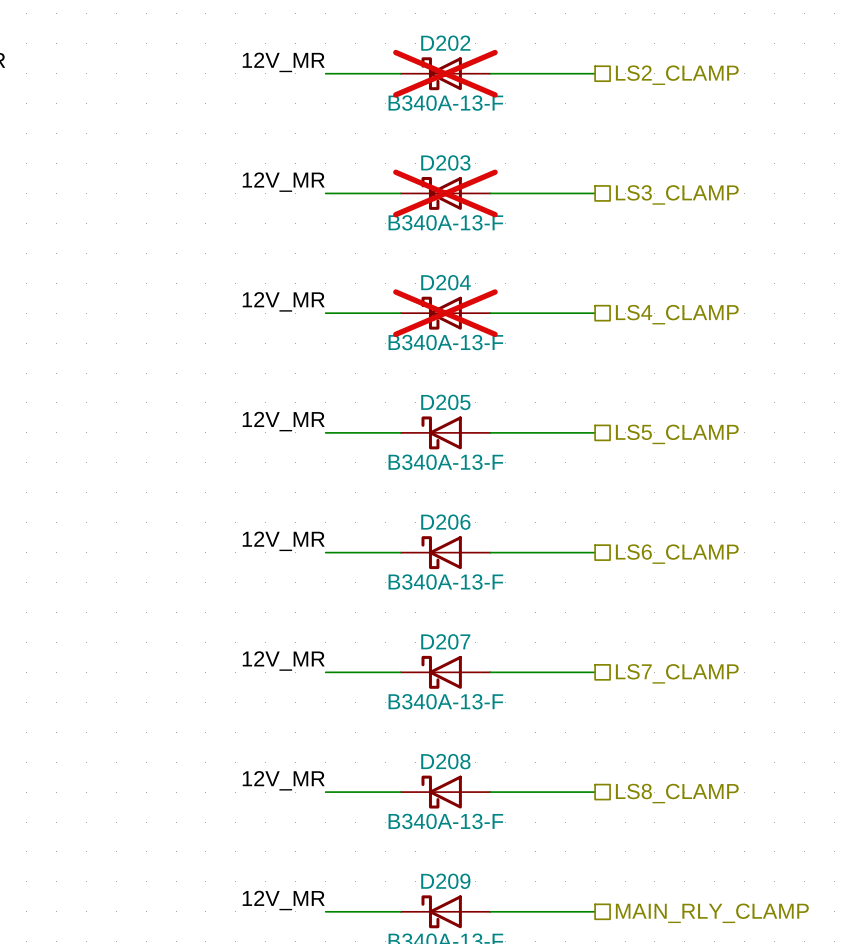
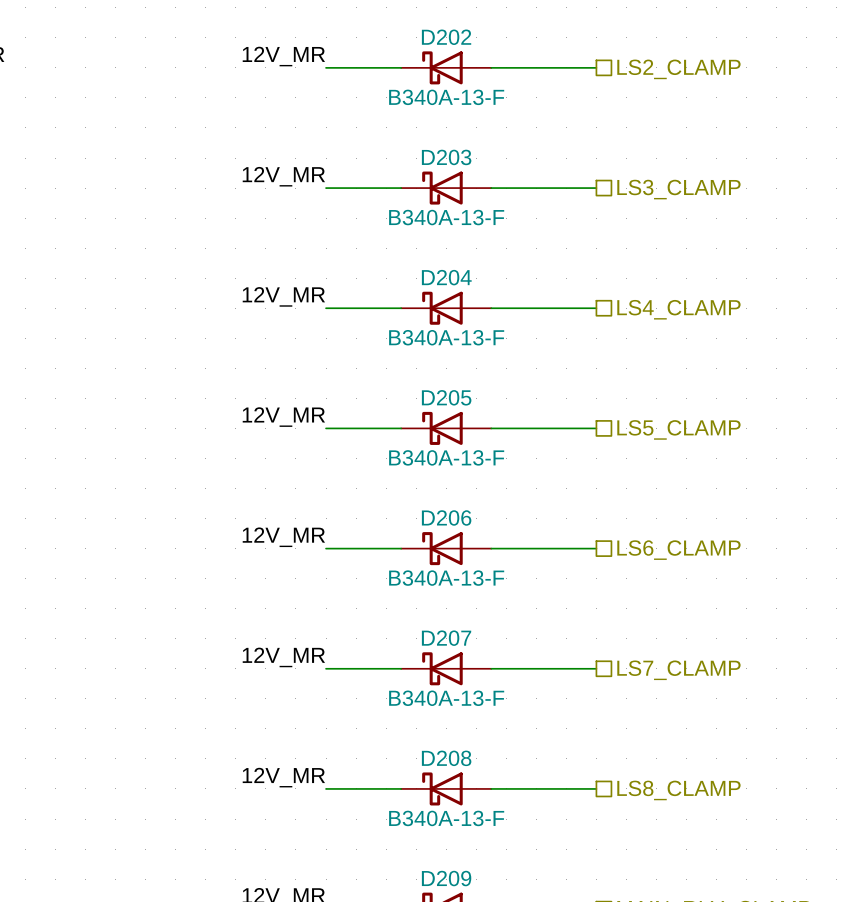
D202 do-not-place cross: (445, 73) -> none
D203 do-not-place cross: (445, 193) -> none
D204 do-not-place cross: (445, 313) -> none

